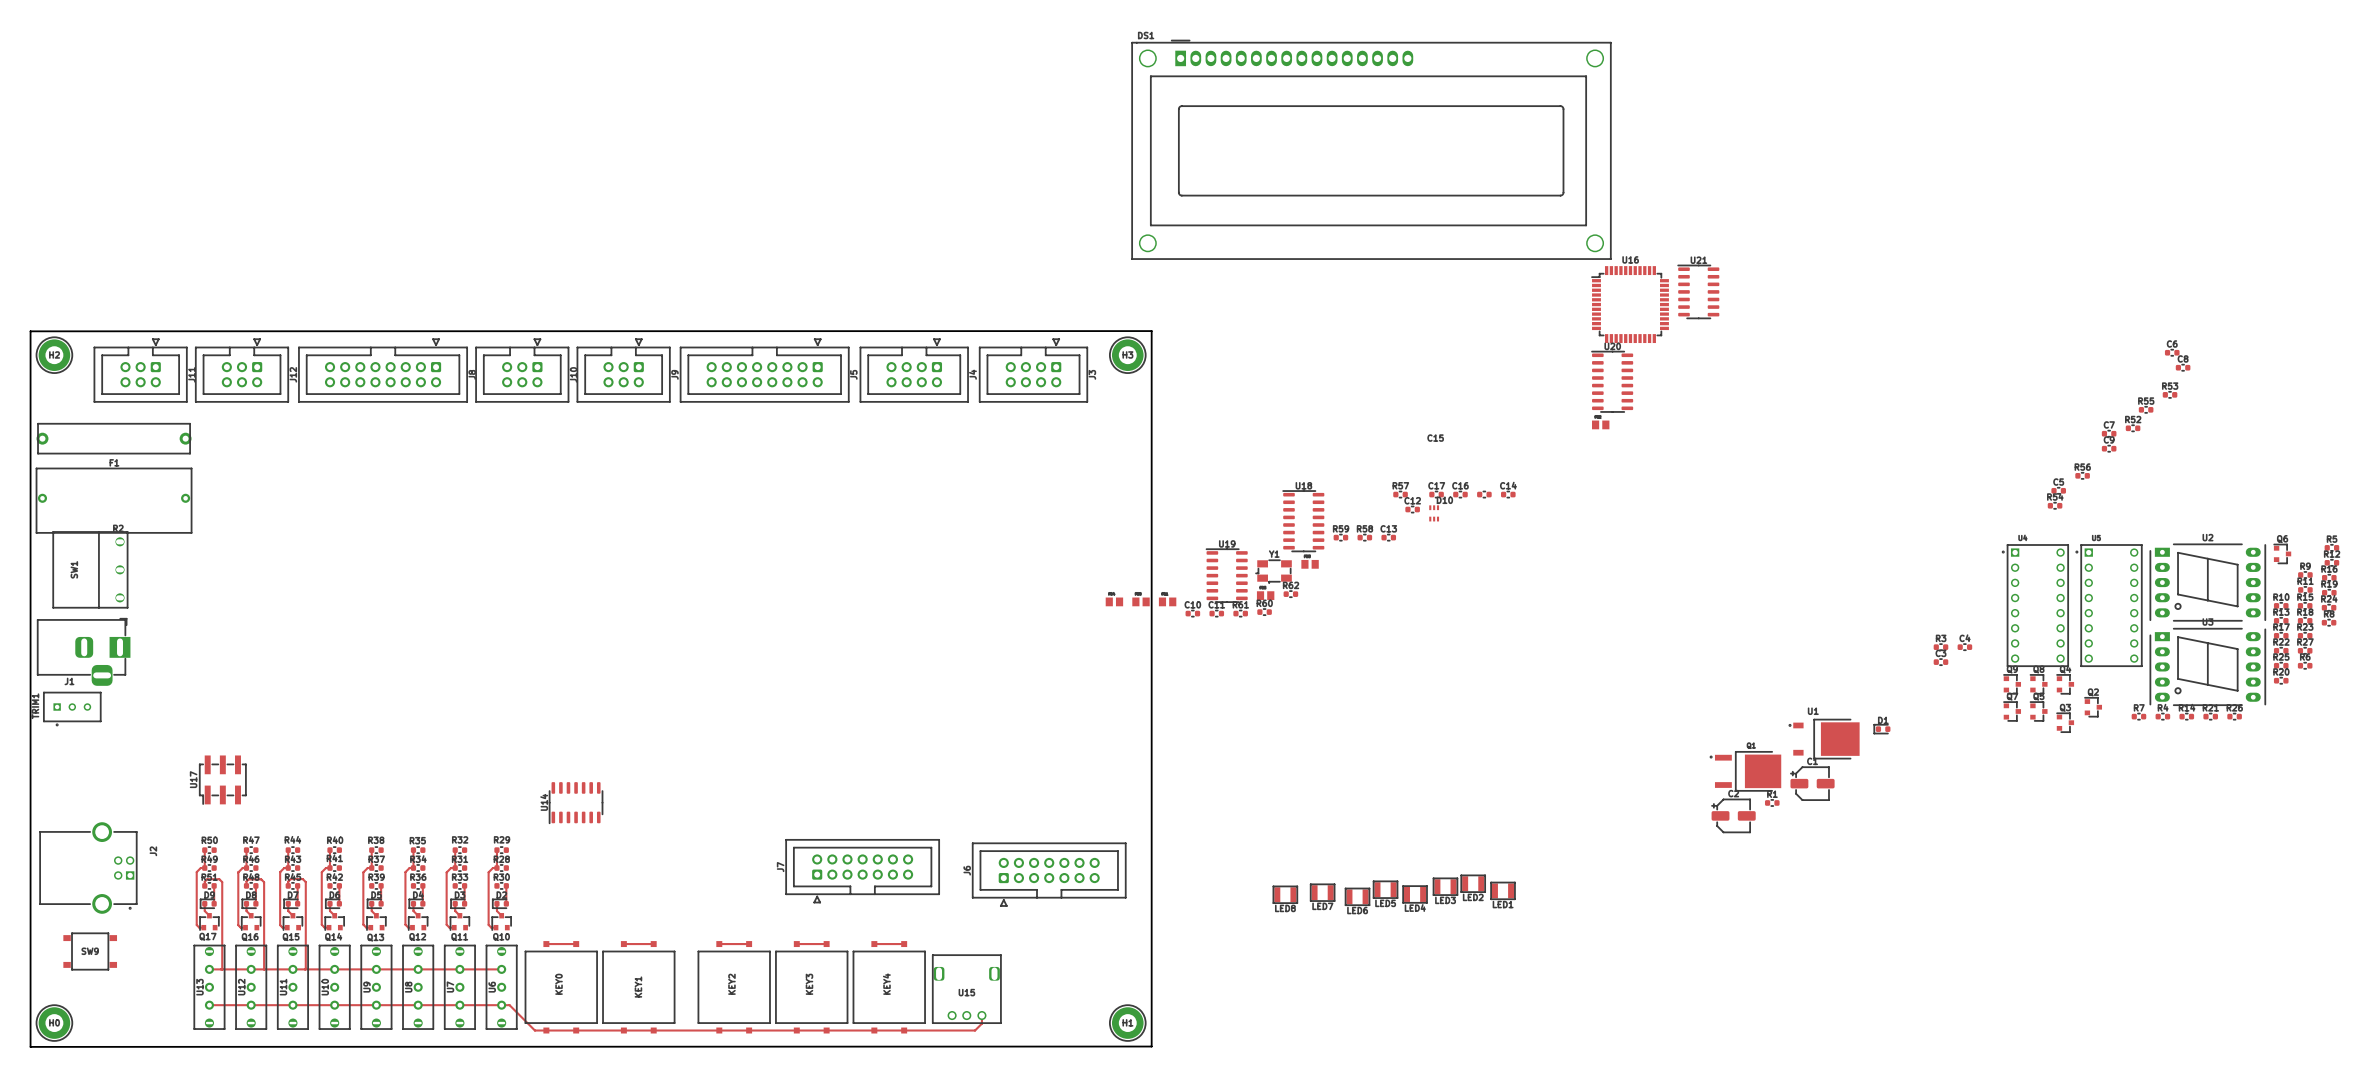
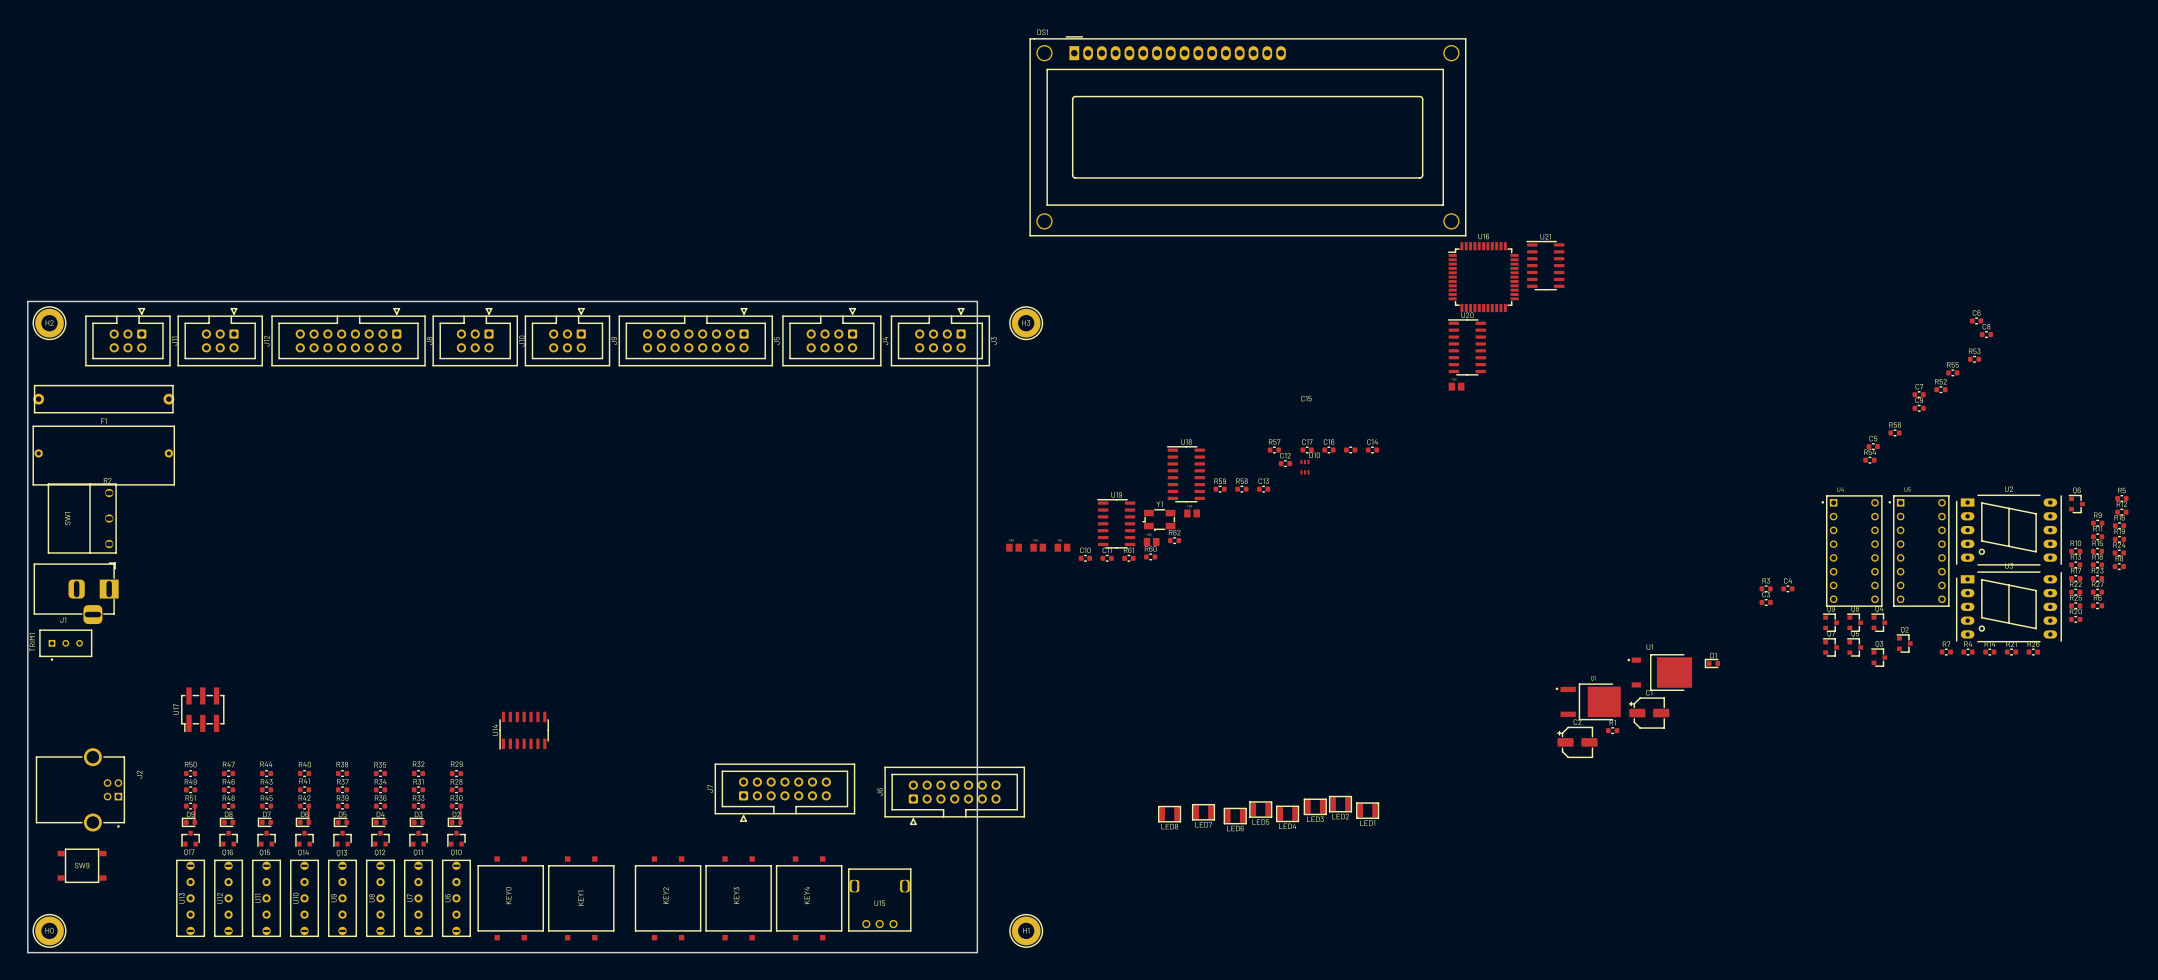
board edge: (30, 331) (1151, 331) (1151, 1046) (30, 1046) -> (27, 301) (977, 301) (977, 952) (27, 952)
track: (204, 850) (204, 868) (200, 868) (196, 872) (196, 925) (199, 927) (203, 927) -> none
track: (246, 850) (246, 868) (242, 868) (238, 872) (238, 925) (240, 927) (245, 927) -> none
track: (288, 850) (288, 868) (284, 868) (280, 872) -> none
track: (329, 850) (329, 868) (325, 868) (321, 872) (321, 924) (324, 927) (329, 927) -> none
track: (371, 850) (371, 868) (367, 868) (363, 872) (363, 924) (366, 927) (370, 927) -> none
track: (413, 850) (413, 868) (409, 868) (405, 872) (405, 924) (408, 927) (412, 927) -> none
track: (455, 850) (455, 868) (451, 868) (446, 872) (446, 924) (449, 927) (454, 927) -> none
track: (496, 850) (496, 868) (492, 868) (488, 872) (488, 924) (491, 927) (495, 927) -> none
track: (280, 872) (280, 925) (282, 927) (287, 927) -> none
track: (204, 885) (207, 879) (219, 879) (222, 882) (222, 969) -> none
track: (246, 885) (248, 879) (261, 879) (264, 882) (264, 969) -> none
track: (255, 885) (255, 903) -> none
track: (288, 885) (290, 879) (302, 879) (305, 882) (305, 969) -> none
track: (297, 885) (297, 903) -> none
track: (381, 885) (381, 903) -> none
track: (422, 885) (422, 903) -> none
track: (464, 885) (464, 903) -> none
track: (204, 903) (204, 911) (209, 915) -> none
track: (246, 903) (246, 911) (251, 915) -> none
track: (288, 903) (288, 911) (292, 915) -> none
track: (329, 903) (329, 911) (334, 915) -> none
track: (371, 903) (371, 911) (376, 915) -> none
track: (413, 903) (413, 911) (418, 915) -> none
track: (455, 903) (455, 911) (459, 915) -> none
track: (496, 903) (496, 911) (501, 915) -> none
track: (546, 944) (576, 944) -> none
track: (623, 944) (653, 944) -> none
track: (719, 944) (749, 944) -> none
track: (796, 944) (826, 944) -> none
track: (874, 944) (904, 944) -> none
track: (209, 969) (501, 969) -> none
track: (209, 1005) (509, 1005) (534, 1030) (975, 1030) (981, 1023) (981, 1015) -> none

